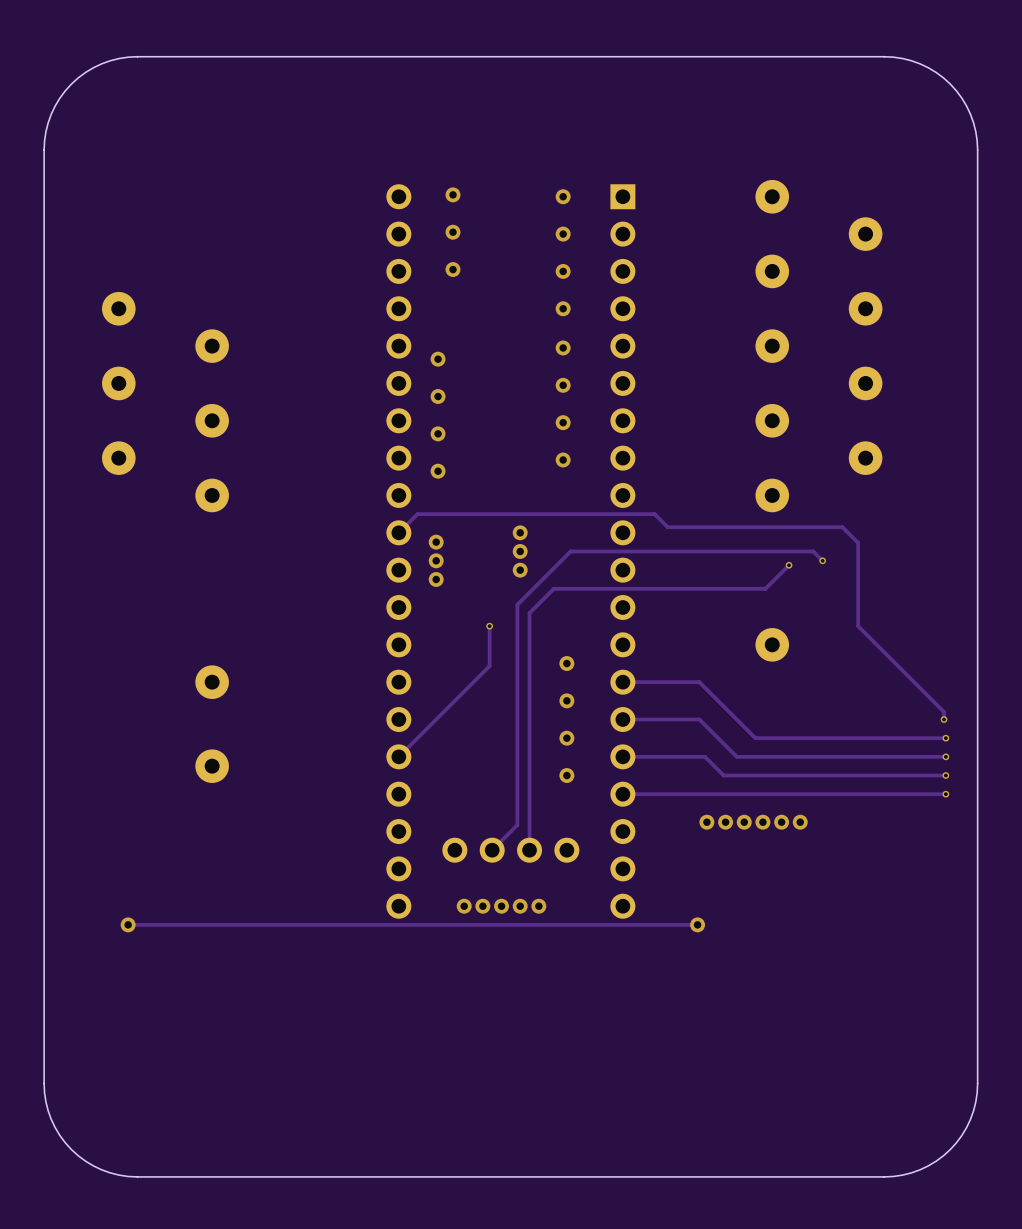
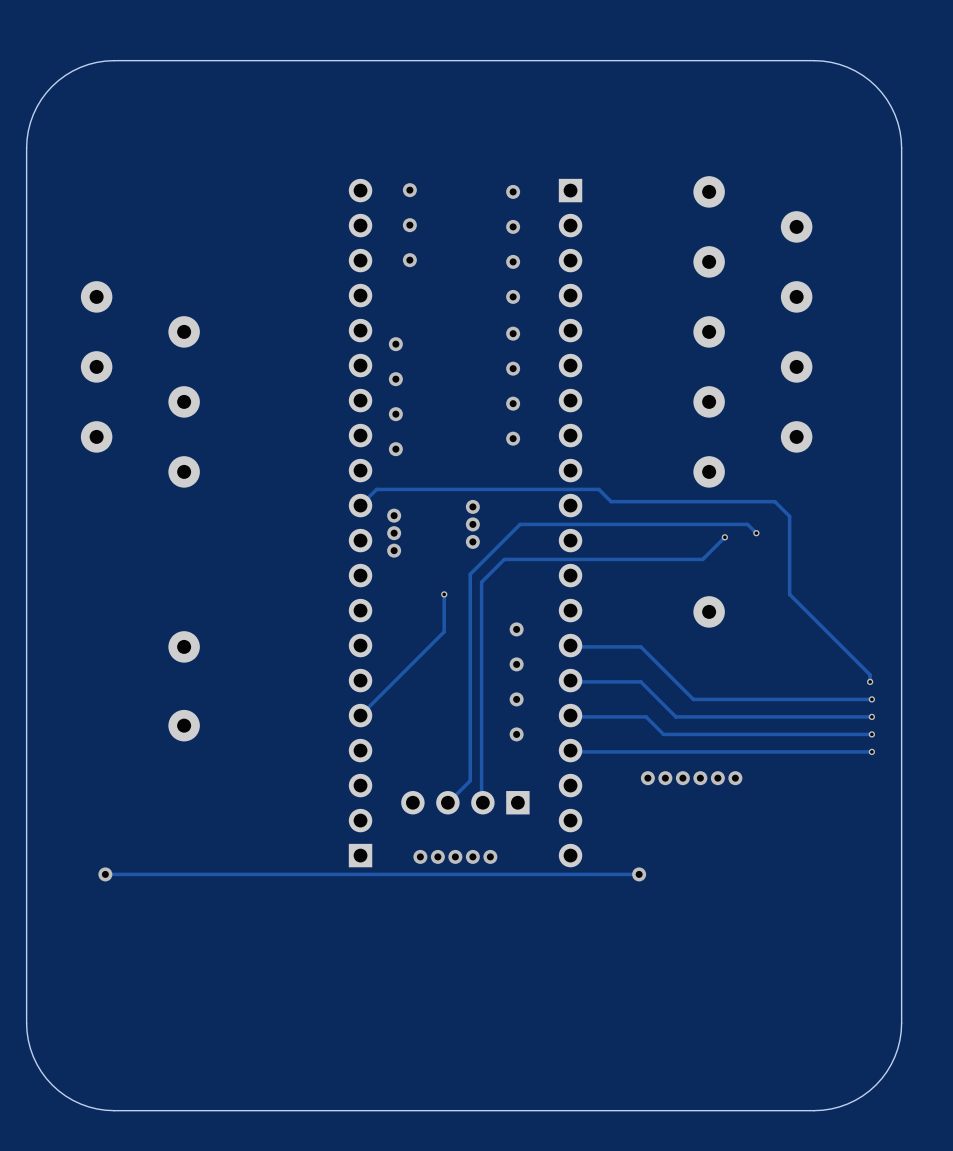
part: none -> (360, 523)
part: none -> (570, 523)
part: (510, 551) -> none
part: none -> (465, 802)

